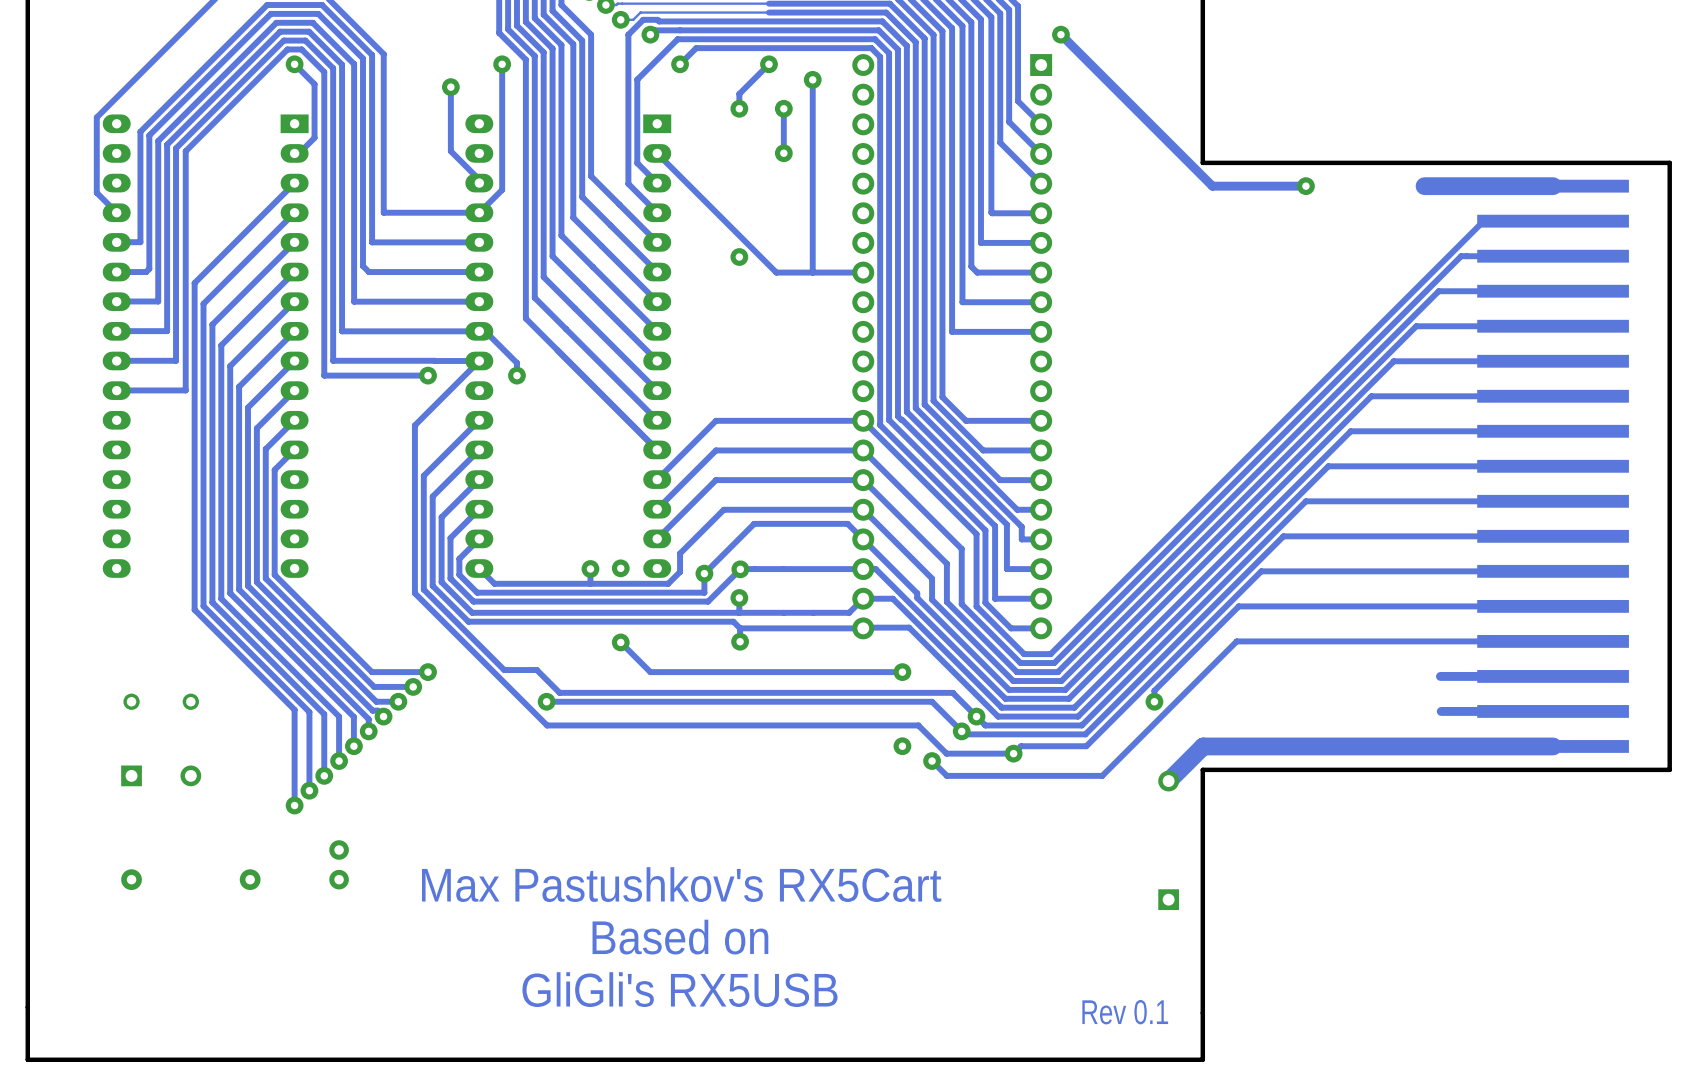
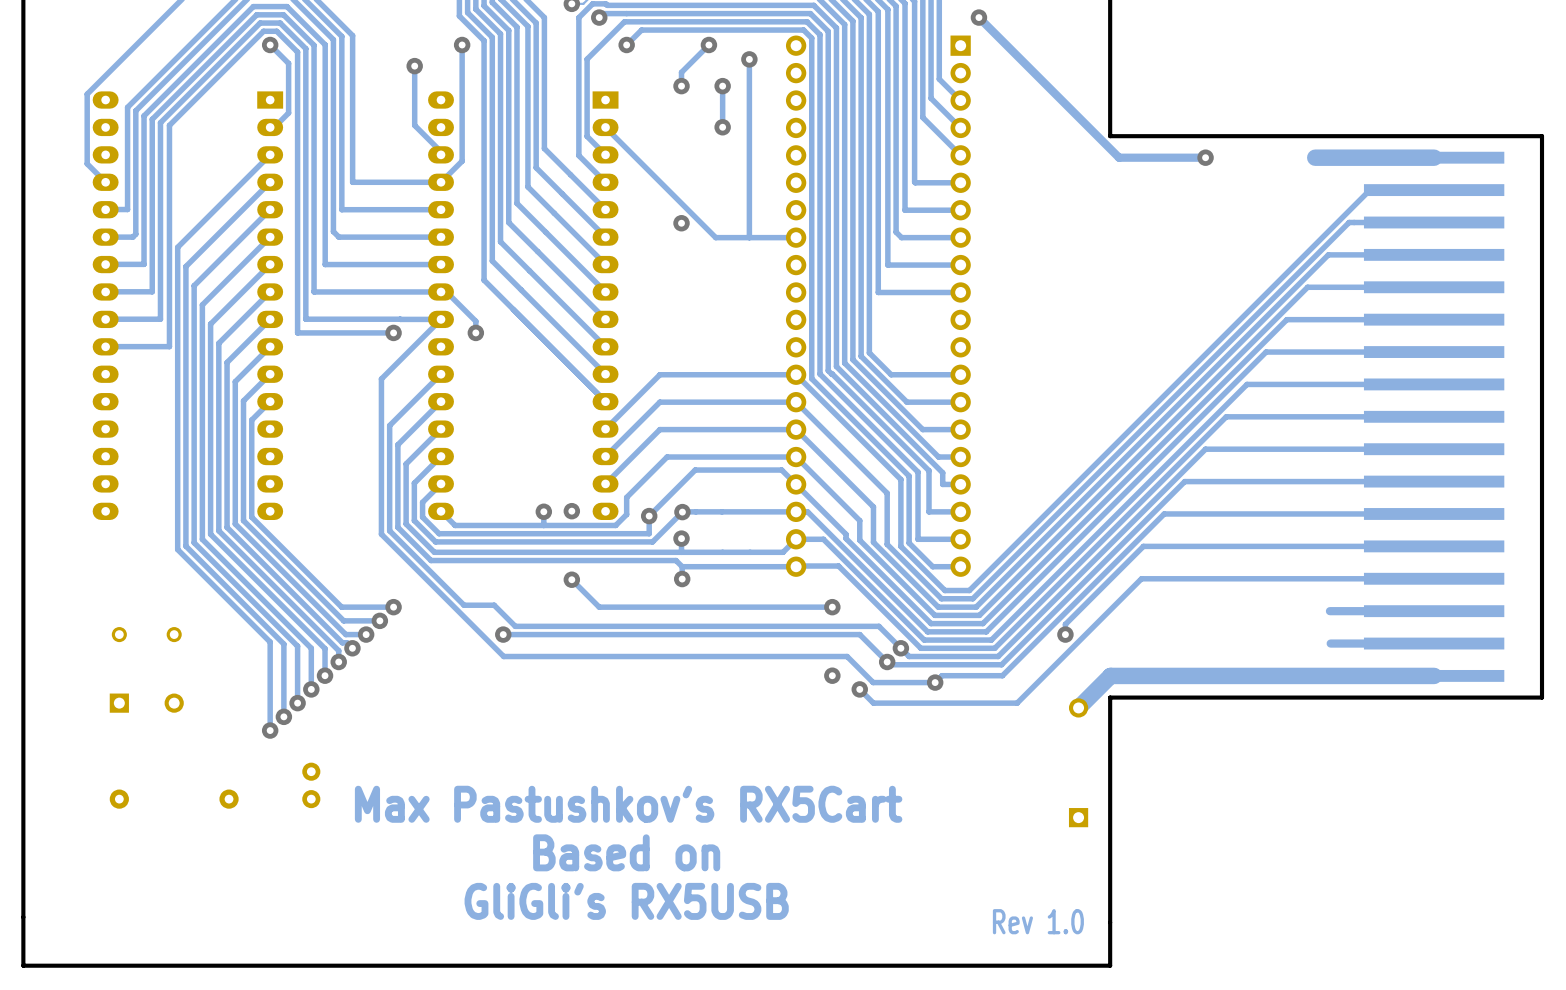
text: Rev 0.1 (1125, 1012) -> Rev 1.0 (1038, 921)

